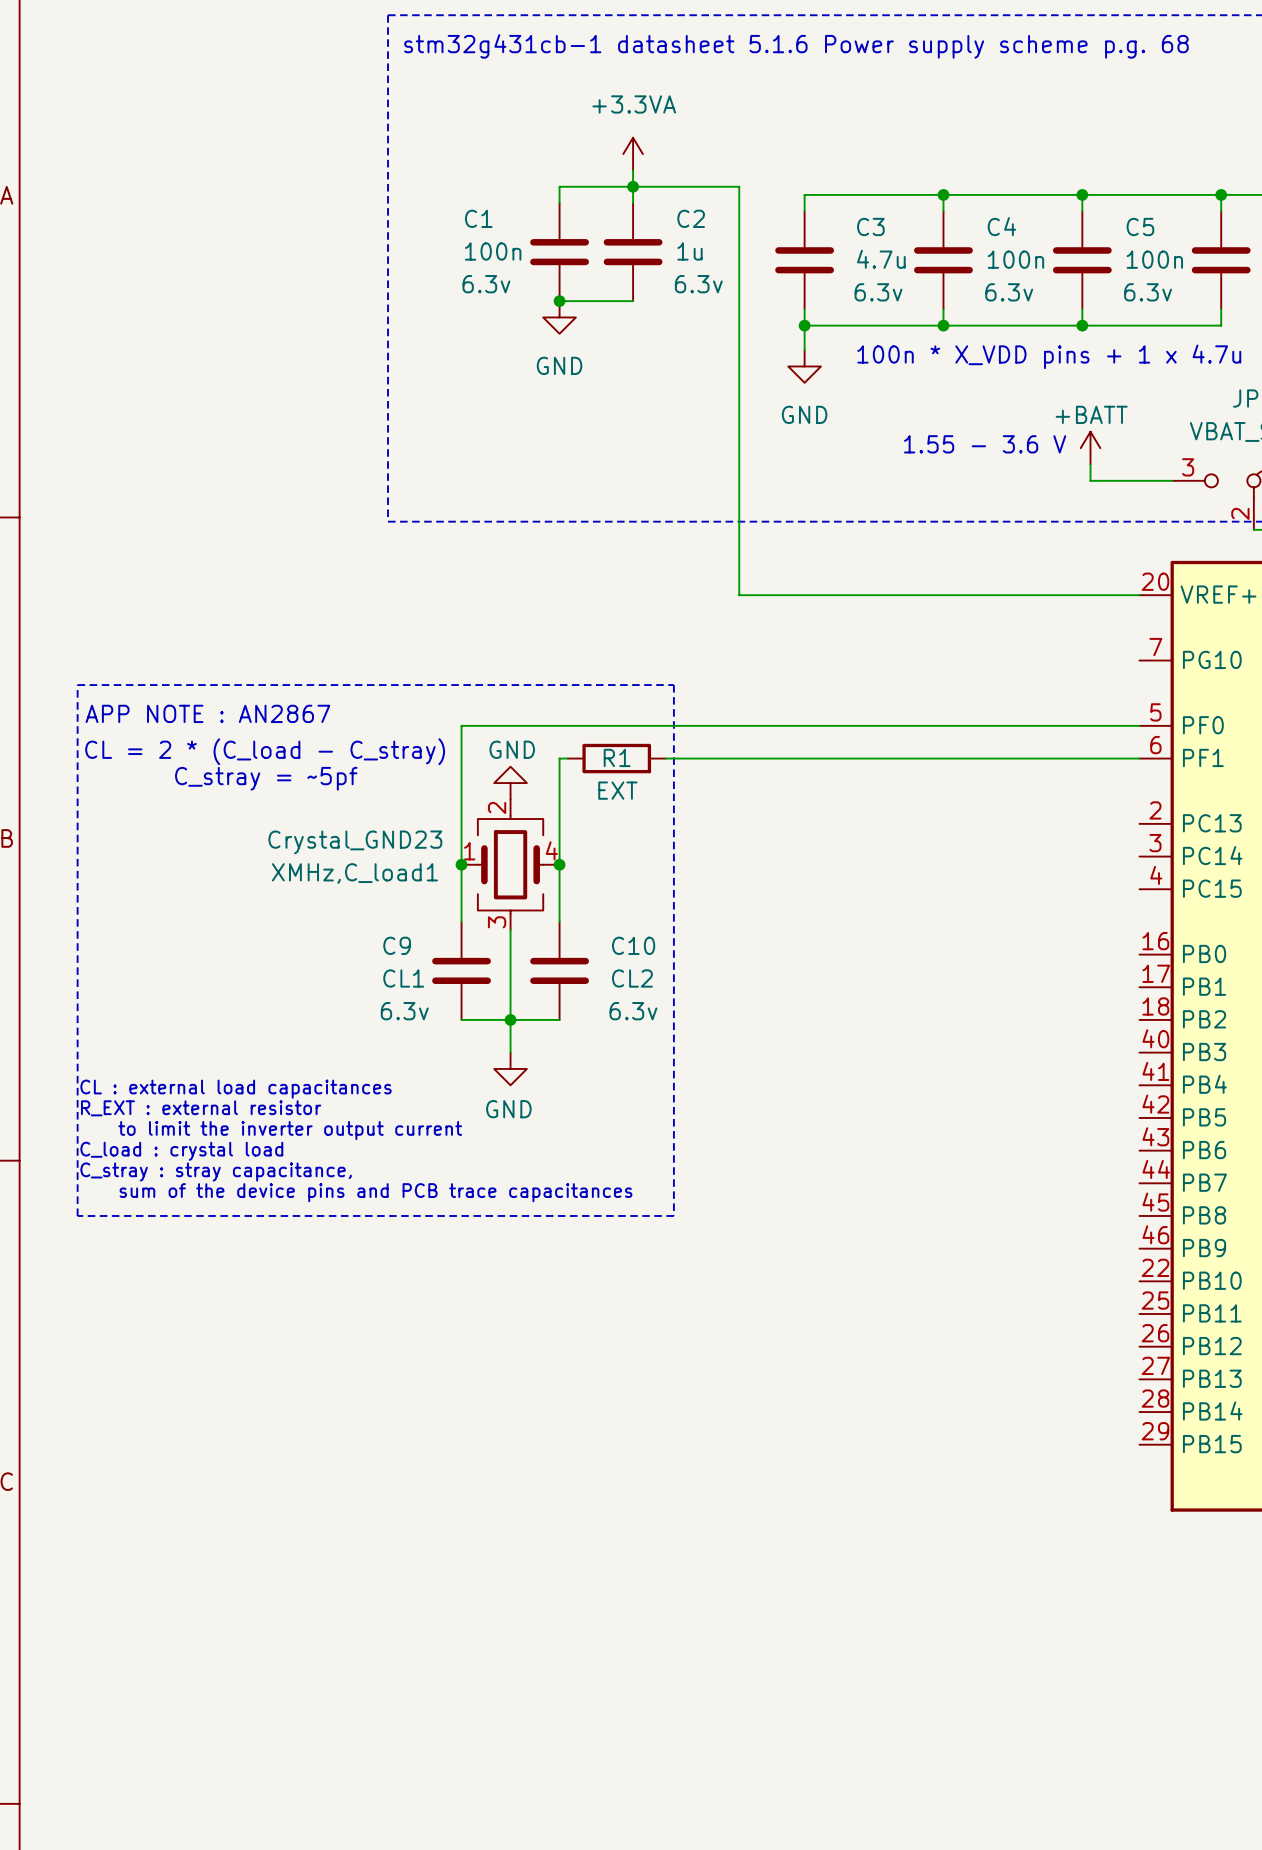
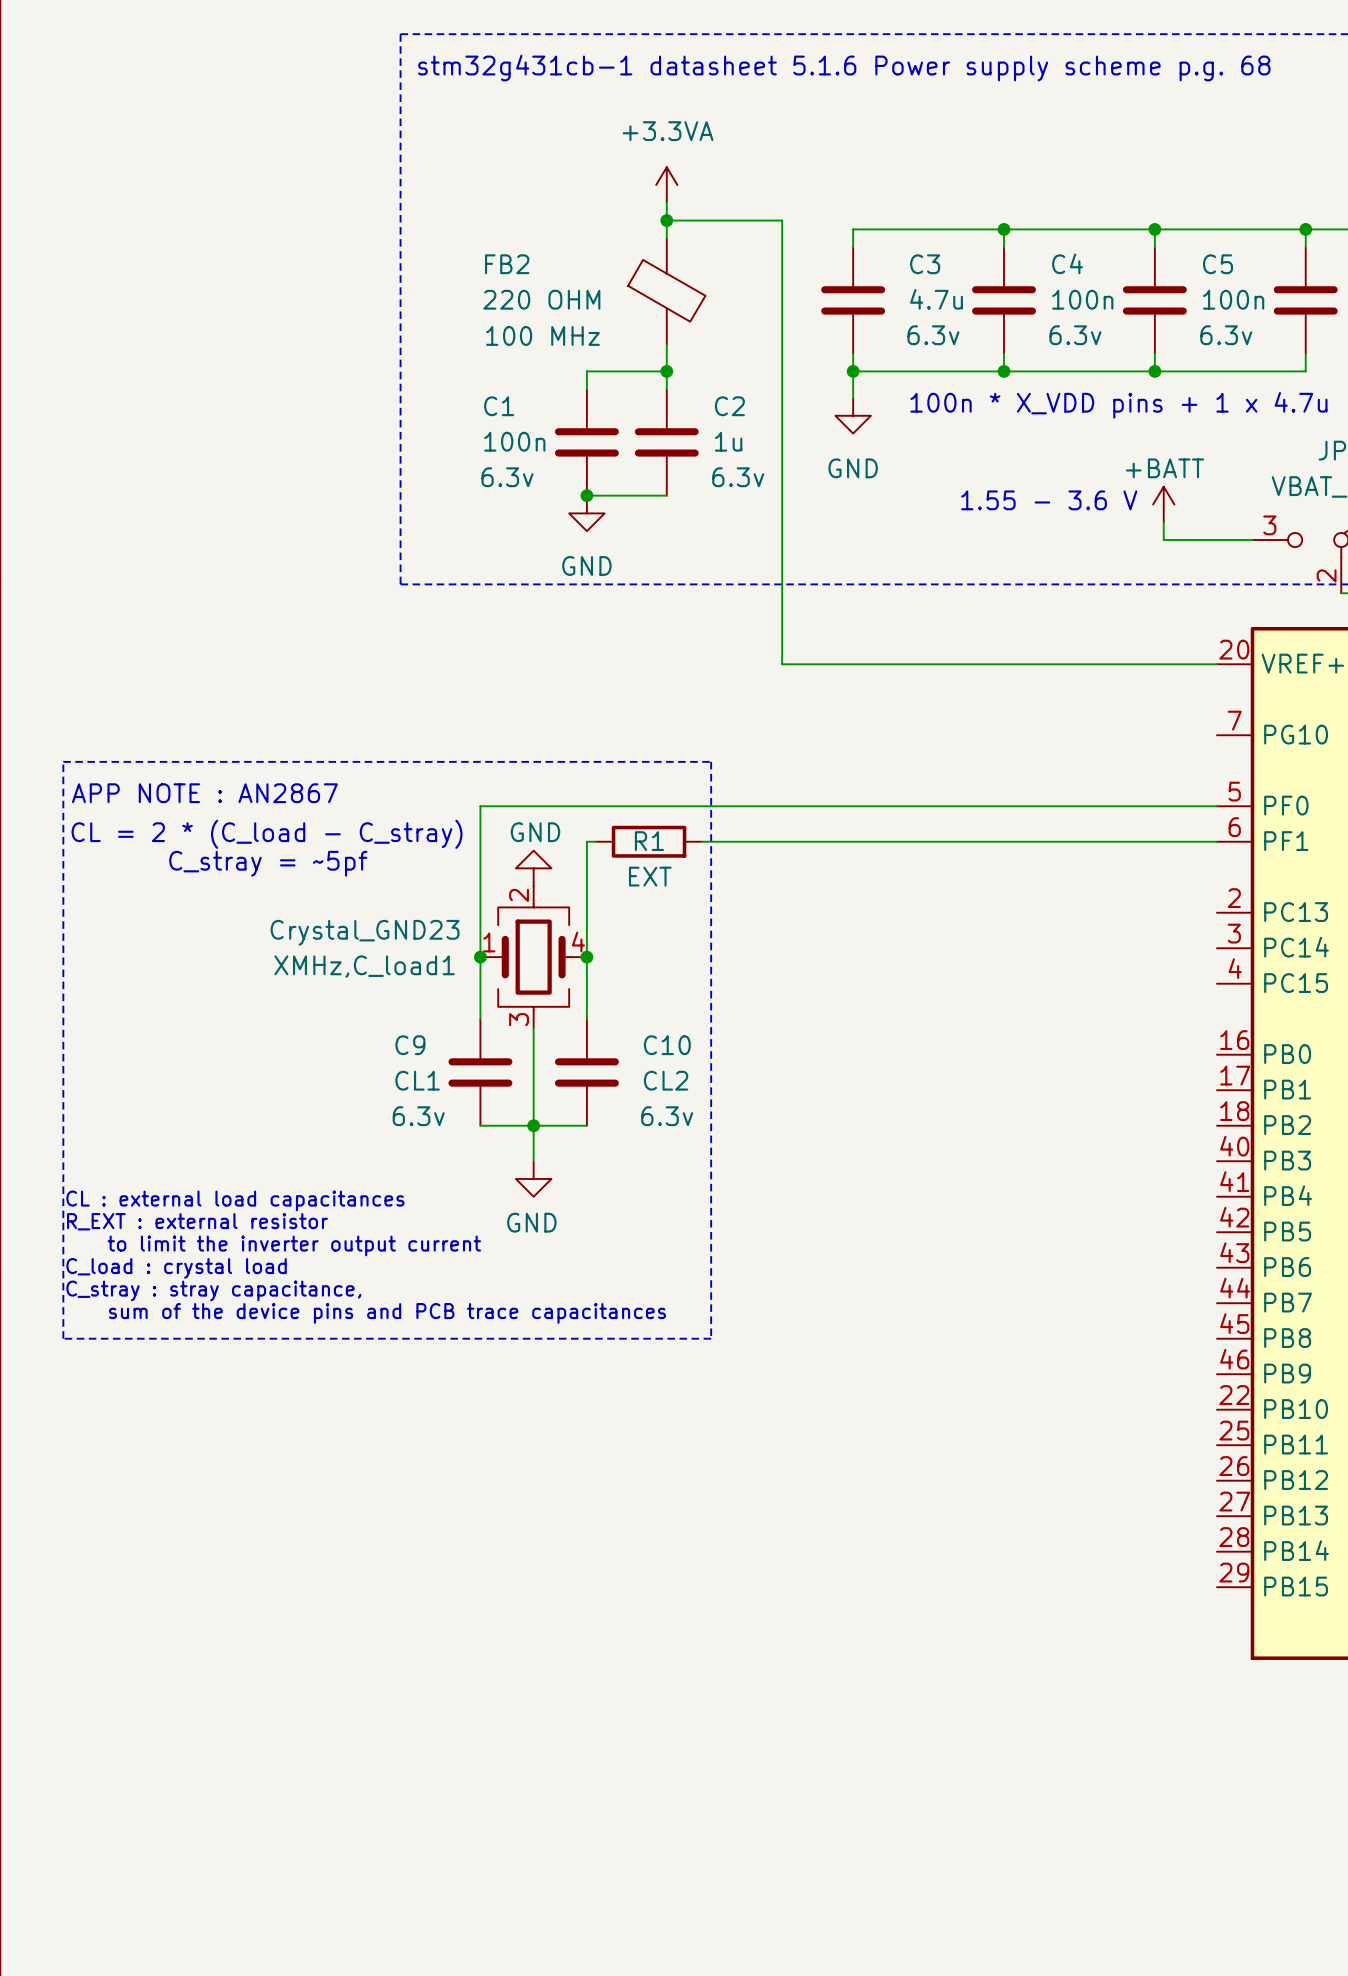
wire: (633, 186) (559, 186) (559, 203) -> (666, 371) (586, 371) (586, 389)
C1 position: (559, 252) -> (586, 442)
C2 position: (633, 252) -> (666, 442)
FB2: none -> 220 OHM (666, 291)
wire: (559, 301) (633, 301) -> (666, 389) (666, 344)
junction: (559, 301) -> none
power symbol position: GND (559, 317) -> GND (586, 513)
junction: none -> (666, 371)
wire: none -> (586, 495) (666, 495)
junction: none -> (586, 495)

